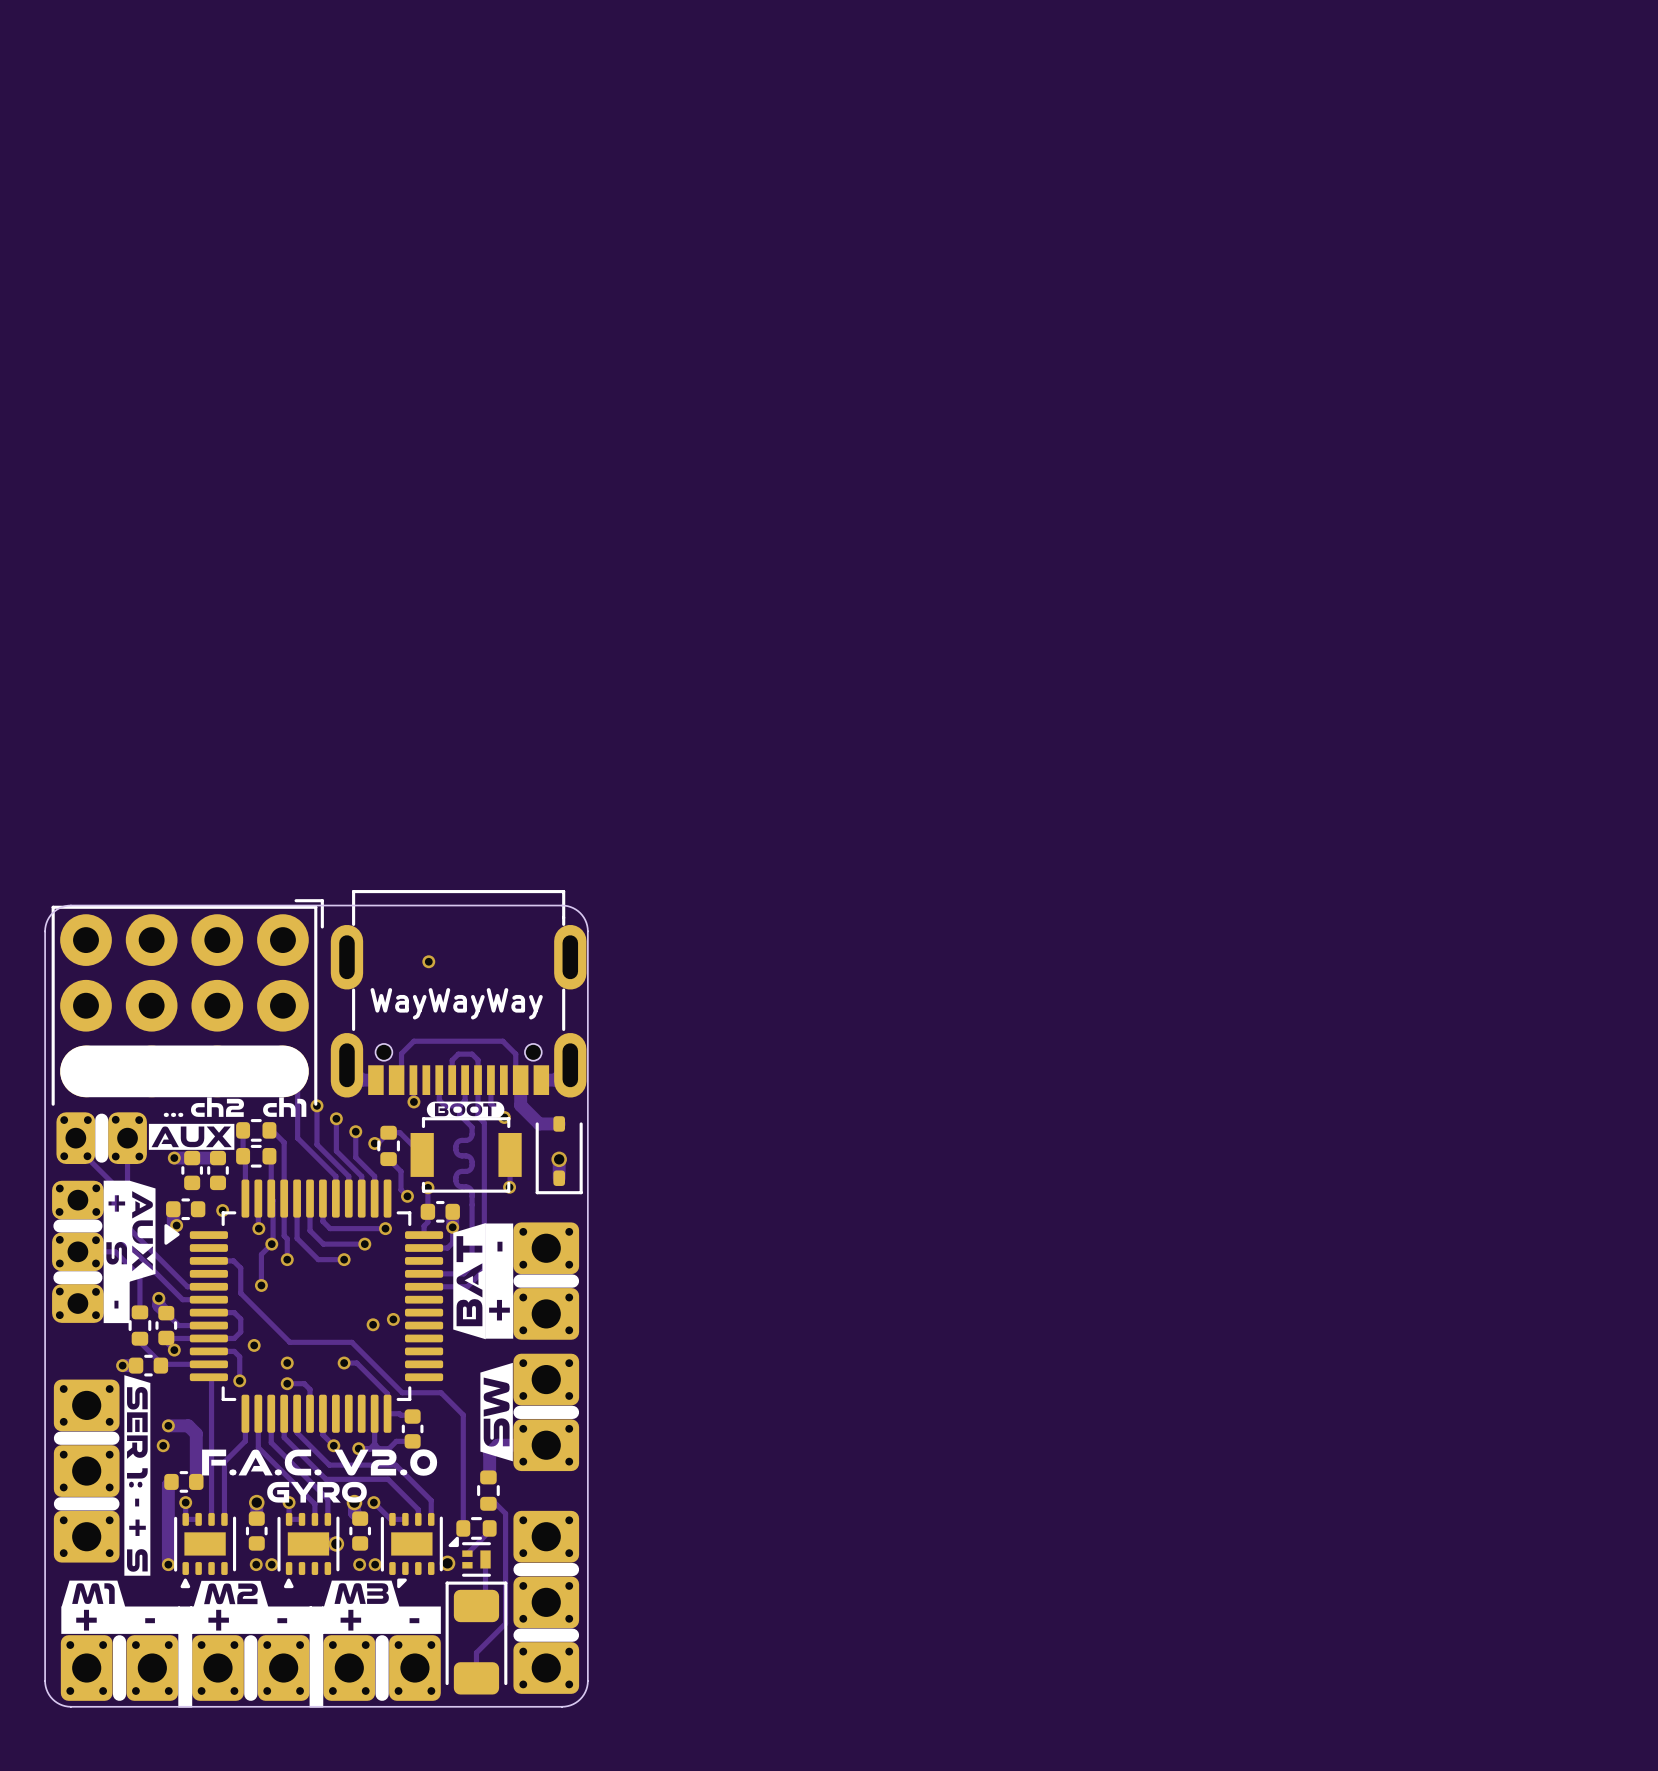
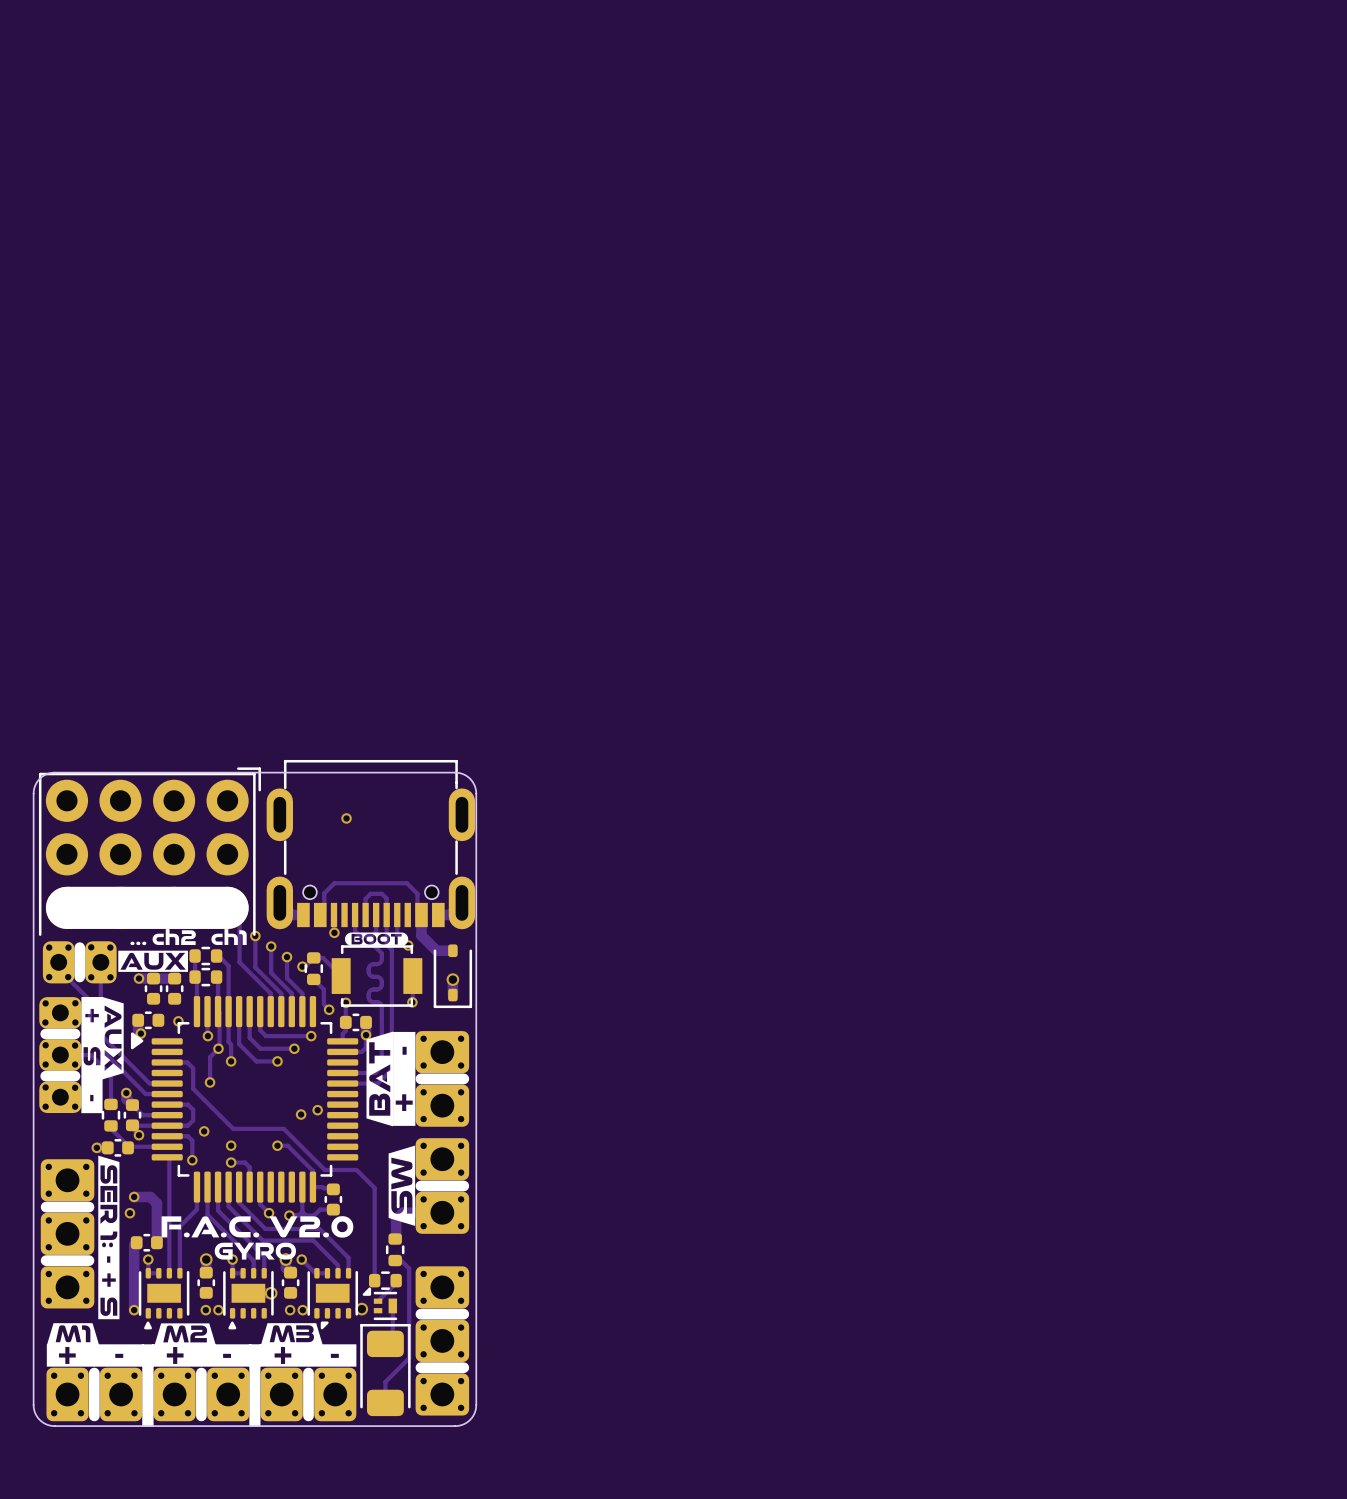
text: WayWayWay (456, 1003) -> none

